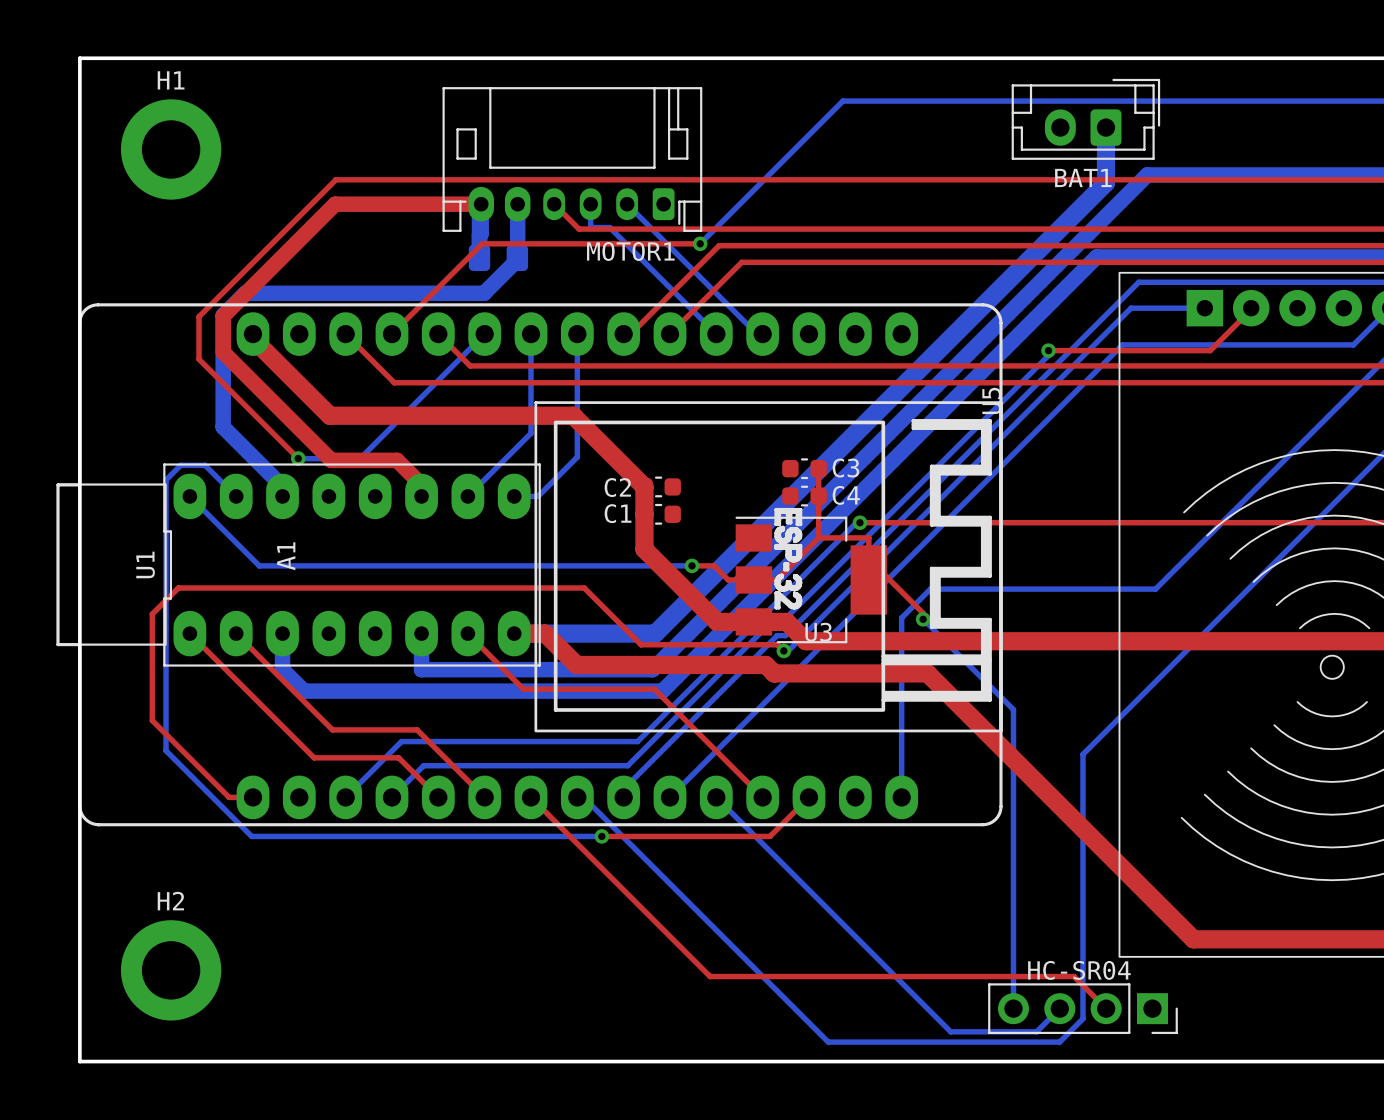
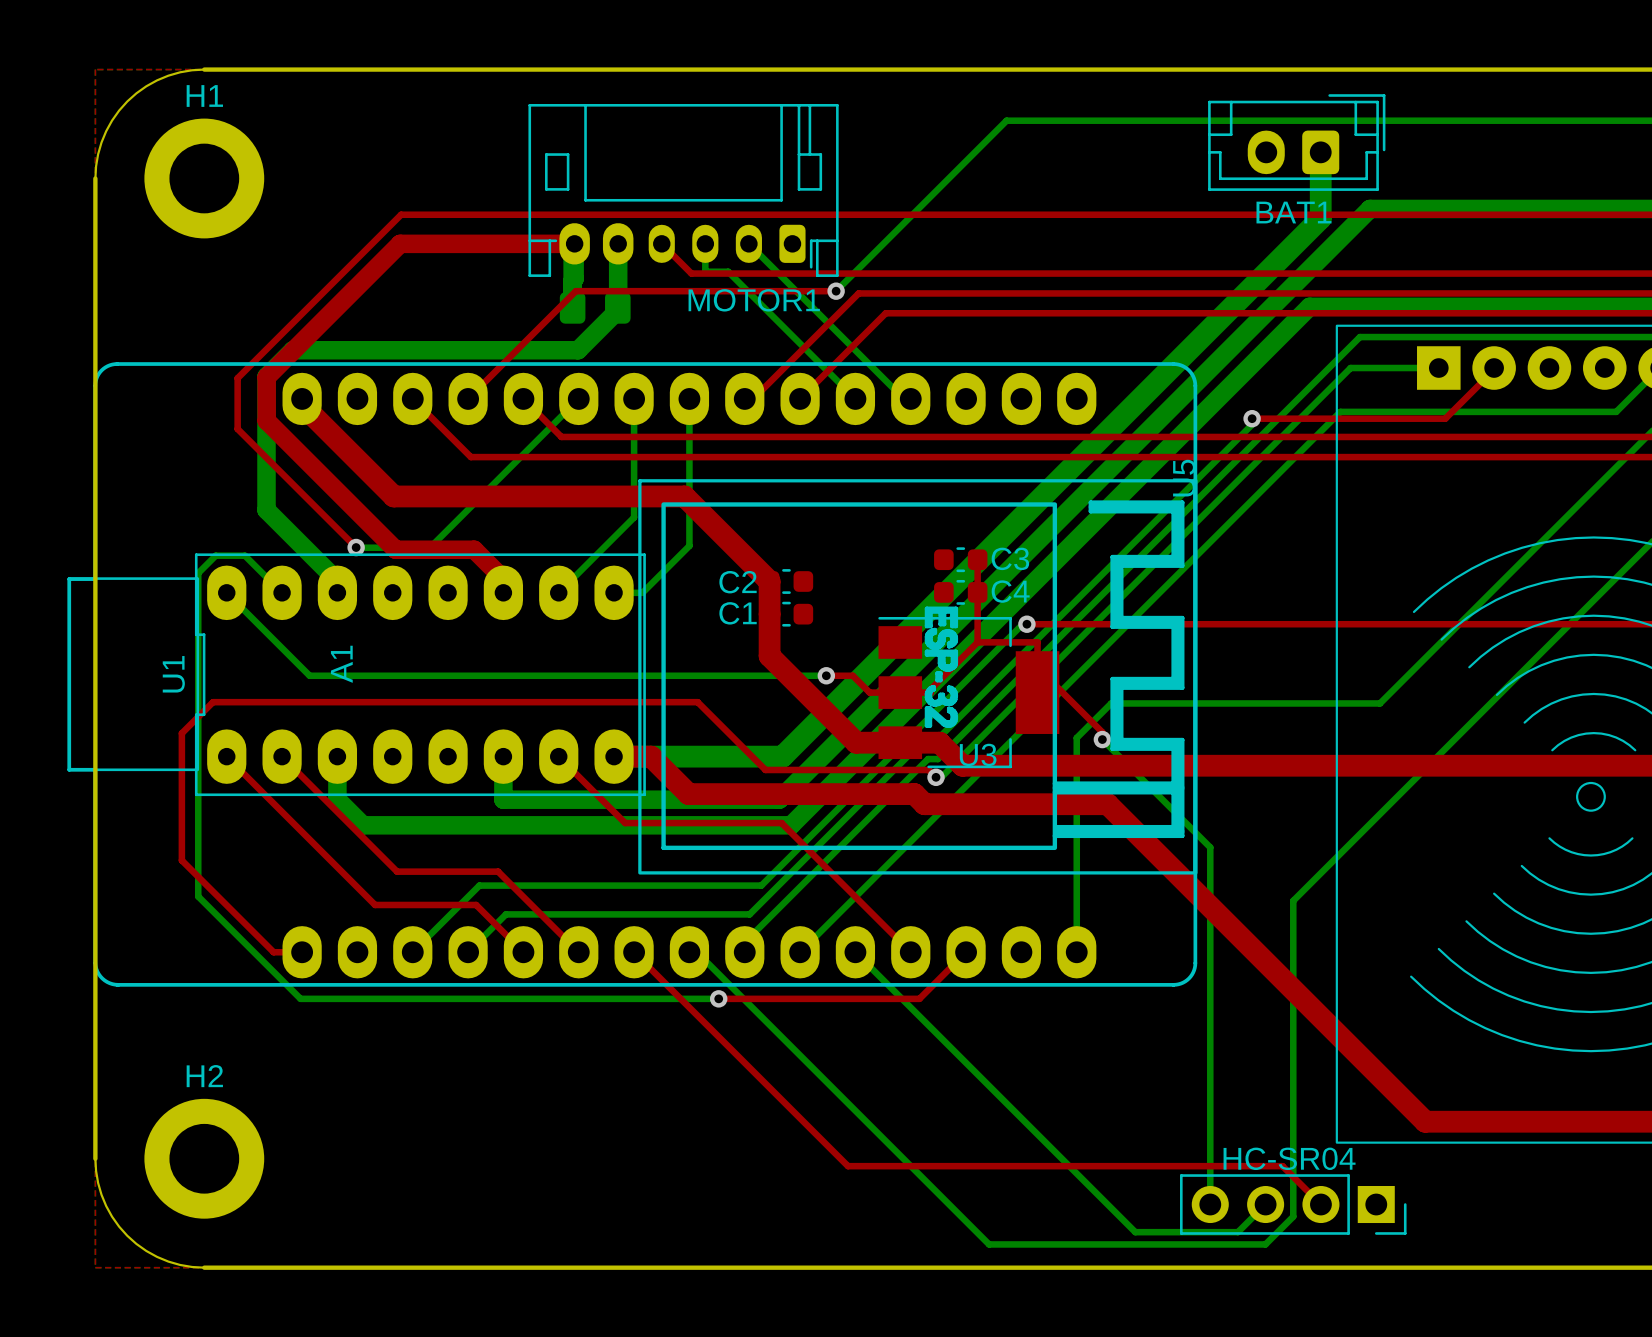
board edge: (171, 58) (79, 58) (79, 149) -> (204, 69) (180, 72) (157, 80) (127, 101) (112, 120) (101, 142) (95, 178)
board edge: (79, 970) (79, 1061) (171, 1061) -> (95, 1158) (98, 1183) (106, 1206) (127, 1235) (146, 1250) (168, 1261) (204, 1267)

